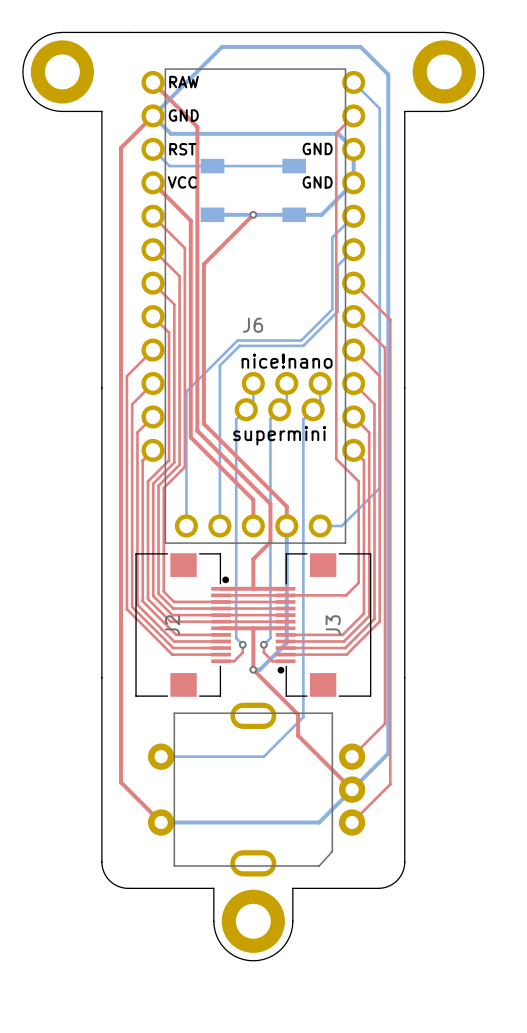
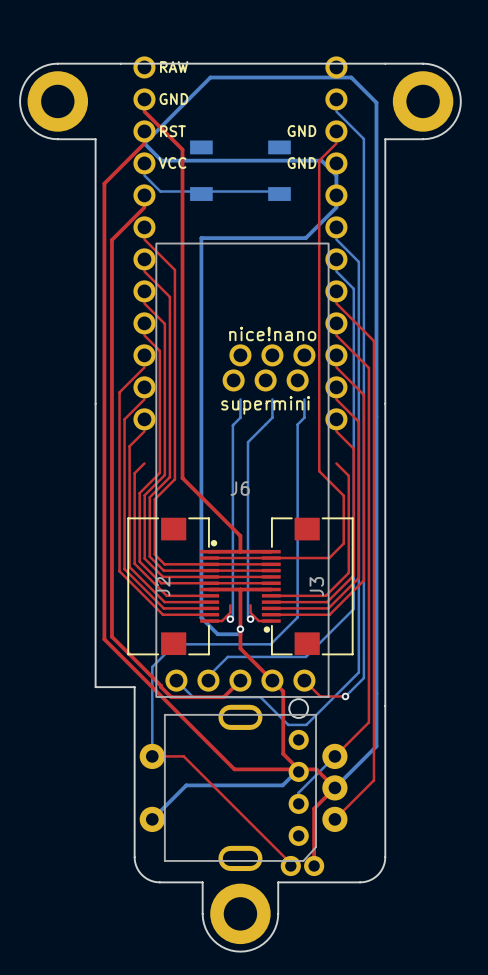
part position: (62, 71) -> (57, 101)
part position: (444, 71) -> (423, 101)
top track: (152, 82) (197, 126) (197, 430) (270, 503) (270, 542) (253, 559) (253, 572) -> (144, 111) (182, 149) (182, 478) (240, 536)
bottom track: (353, 82) (379, 108) (379, 488) (341, 525) (320, 525) -> none
top track: (152, 115) (120, 147) (120, 782) (161, 822) -> none
top track: (353, 115) (336, 133) (336, 459) (358, 481) (358, 582) -> (336, 143) (319, 160) (319, 471) (343, 495) (343, 543) (341, 546)
bottom track: none -> (336, 111) (363, 138) (363, 678) (345, 696)
bottom track: (152, 149) (169, 166) (294, 166) -> (144, 175) (160, 191) (279, 191)
board edge: (101, 157) (101, 111) (52, 110) (38, 103) (25, 87) (22, 71) (25, 56) (34, 44) (47, 35) (62, 32) (444, 32) (459, 35) (472, 44) (480, 56) (483, 71) (480, 87) (468, 103) (454, 110) (404, 111) (404, 157) -> (95, 139) (52, 138) (38, 134) (31, 128) (22, 115) (20, 101) (22, 86) (31, 74) (43, 66) (57, 63) (423, 63) (437, 66) (449, 74) (457, 86) (460, 101) (457, 115) (449, 128) (441, 134) (428, 138) (385, 139)
top track: none -> (144, 143) (104, 183) (104, 639) (234, 769) (316, 769) (334, 787) (314, 808) (314, 863)
top track: (152, 182) (190, 220) (190, 437) (253, 499) (253, 525) -> none
bottom track: (212, 214) (321, 214) (353, 182) (353, 149) (338, 133) (170, 133) (152, 115) (221, 46) (360, 46) (388, 74) (388, 753) (319, 822) (161, 822) -> none
top track: (253, 214) (203, 264) (203, 423) (286, 506) (286, 525) -> none
via: (253, 214) -> none
top track: (152, 216) (184, 248) (184, 294) -> (144, 239) (174, 269)
bottom track: (353, 216) (332, 237) (332, 309) (301, 340) (237, 340) (186, 391) (186, 525) -> none
top track: none -> (144, 207) (111, 240) (111, 636) (171, 697) (223, 697) (240, 680)
top track: (152, 249) (179, 276) (179, 322) -> (144, 271) (169, 296)
bottom track: (353, 249) (337, 265) (337, 311) (303, 345) (239, 345) (219, 365) (219, 525) -> none
bottom track: none -> (336, 239) (358, 261) (358, 672) (306, 724) (288, 724) (260, 697) (193, 697) (176, 680)
top track: (152, 283) (174, 304) (174, 350) -> (144, 303) (164, 323)
top track: (353, 283) (390, 319) (390, 784) (352, 822) -> none
bottom track: none -> (336, 271) (353, 288) (353, 609) (305, 656) (227, 656) (208, 676) (208, 680)
J6 position: (255, 306) -> (242, 470)
top track: (152, 316) (169, 332) (169, 378) -> (144, 335) (159, 350)
top track: (353, 316) (385, 347) (385, 723) (352, 756) -> none
top track: none -> (336, 303) (373, 341) (373, 780) (334, 819)
top track: (152, 350) (126, 376) (126, 422) -> (144, 367) (119, 392)
top track: (353, 350) (379, 376) (379, 621) -> (336, 367) (363, 394) (363, 580) (361, 583)
top track: none -> (336, 335) (368, 367) (368, 722) (334, 756)
top track: (152, 383) (132, 404) (132, 450) -> (144, 399) (124, 419)
bottom track: (253, 383) (253, 402) (236, 419) (236, 638) (242, 644) -> none
bottom track: (286, 383) (286, 402) (270, 418) (270, 638) (263, 644) -> none
bottom track: (320, 383) (320, 402) (303, 419) (303, 717) (263, 756) (161, 756) -> none
top track: (353, 383) (374, 404) (374, 618) -> (336, 399) (358, 421) (358, 577) (356, 580)
top track: (152, 416) (137, 432) (137, 478) -> (144, 431) (129, 446)
top track: (353, 416) (369, 432) (369, 616) -> (336, 431) (353, 448) (353, 575) (351, 577)
bottom track: none -> (240, 399) (240, 417) (232, 425) (232, 616) (230, 619)
bottom track: none -> (272, 399) (272, 417) (248, 442) (248, 616) (250, 619)
bottom track: none -> (304, 399) (304, 417) (297, 424) (297, 617) (270, 644) (174, 644) (152, 666) (152, 756)
top track: (152, 450) (142, 460) (142, 506) -> (144, 463) (134, 473)
top track: (353, 450) (363, 460) (363, 613) -> (336, 463) (348, 475) (348, 572) (346, 575)
top track: (169, 460) (147, 481) (147, 527) -> (159, 428) (159, 473) (139, 493)
top track: (174, 462) (153, 483) (153, 529) -> (164, 431) (164, 475) (144, 495)
top track: (179, 464) (158, 485) (158, 531) -> (169, 433) (169, 477) (149, 497)
top track: (184, 466) (163, 488) (163, 534) -> (174, 435) (174, 479) (154, 499)
bottom track: (286, 525) (286, 642) (259, 669) (253, 669) -> none
via: (242, 644) -> none
via: (263, 644) -> none
via: none -> (230, 619)
via: none -> (250, 619)
top track: (253, 669) (298, 714) (298, 734) -> (240, 629) (240, 648) (283, 691)
bottom track: none -> (240, 634) (217, 634) (201, 617) (201, 238) (305, 238) (336, 207) (336, 175) (321, 160) (161, 160) (144, 143) (210, 77) (351, 77) (376, 102) (376, 746) (334, 787)
top track: none -> (304, 680) (320, 696) (345, 696)
board edge: (101, 730) (101, 862) (105, 876) (114, 884) (125, 888) (213, 888) (213, 921) (216, 936) (225, 949) (238, 957) (253, 960) (263, 959) (277, 952) (284, 945) (292, 926) (292, 888) (384, 887) (399, 878) (404, 862) -> (95, 687) (134, 687) (134, 857) (137, 868) (144, 876) (154, 881) (202, 882) (202, 913) (205, 928) (213, 940) (225, 948) (235, 951) (250, 950) (259, 946) (270, 936) (277, 918) (278, 882) (362, 882) (375, 876) (382, 868) (385, 860) (385, 813)
top track: (298, 735) (352, 789) -> (283, 692) (283, 753) (298, 769)
via: none -> (345, 696)
part position: (256, 789) -> (243, 787)
top track: none -> (152, 756) (183, 756) (290, 863)
bottom track: none -> (334, 756) (298, 792) (298, 801)
bottom track: none -> (298, 769) (282, 785) (186, 785) (152, 819)
part: none -> (302, 787)
part position: (253, 921) -> (240, 913)

